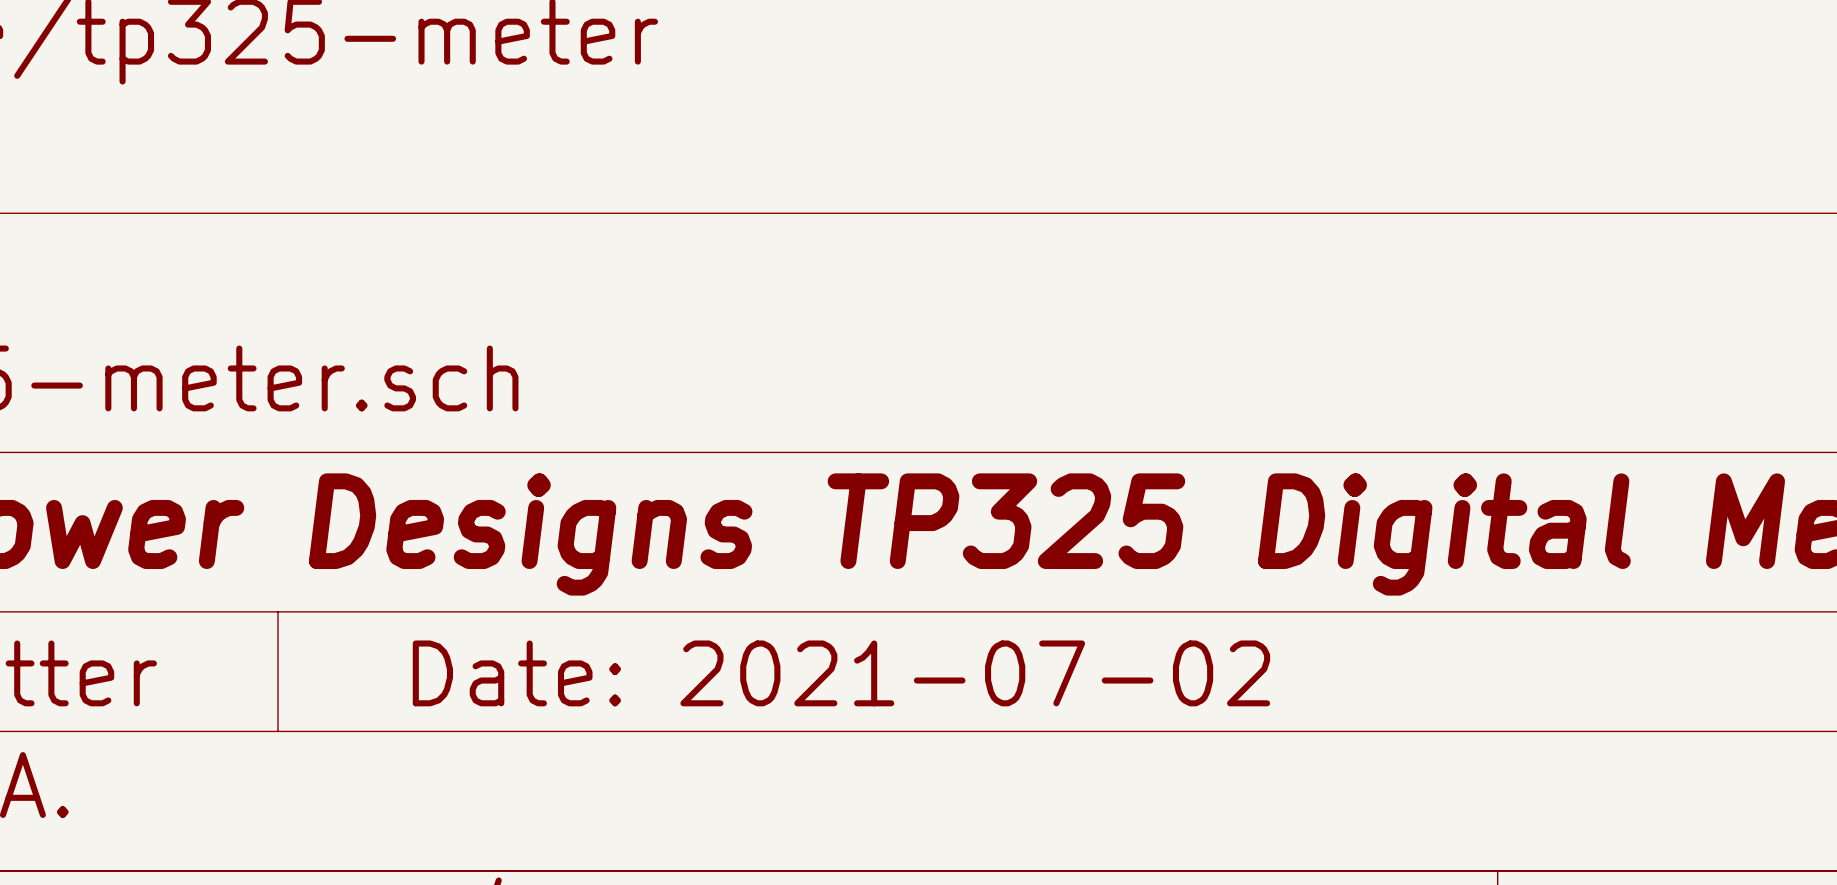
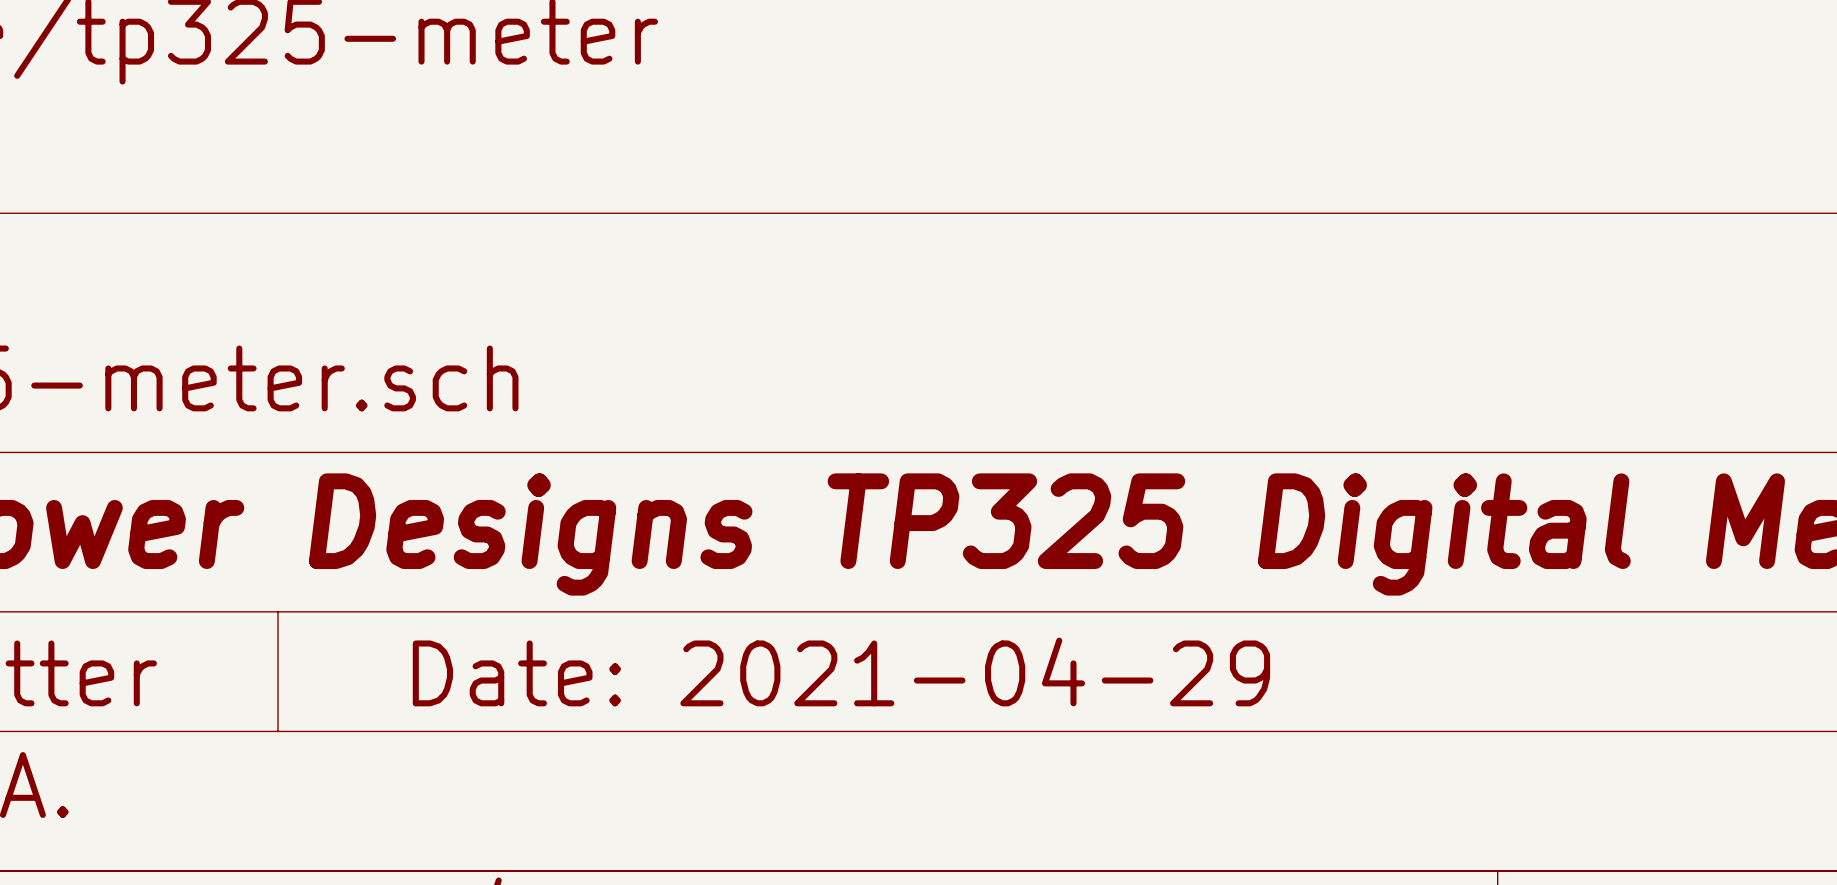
title block: Date: 2021-07-02 (841, 673) -> Date: 2021-04-29 (841, 671)

